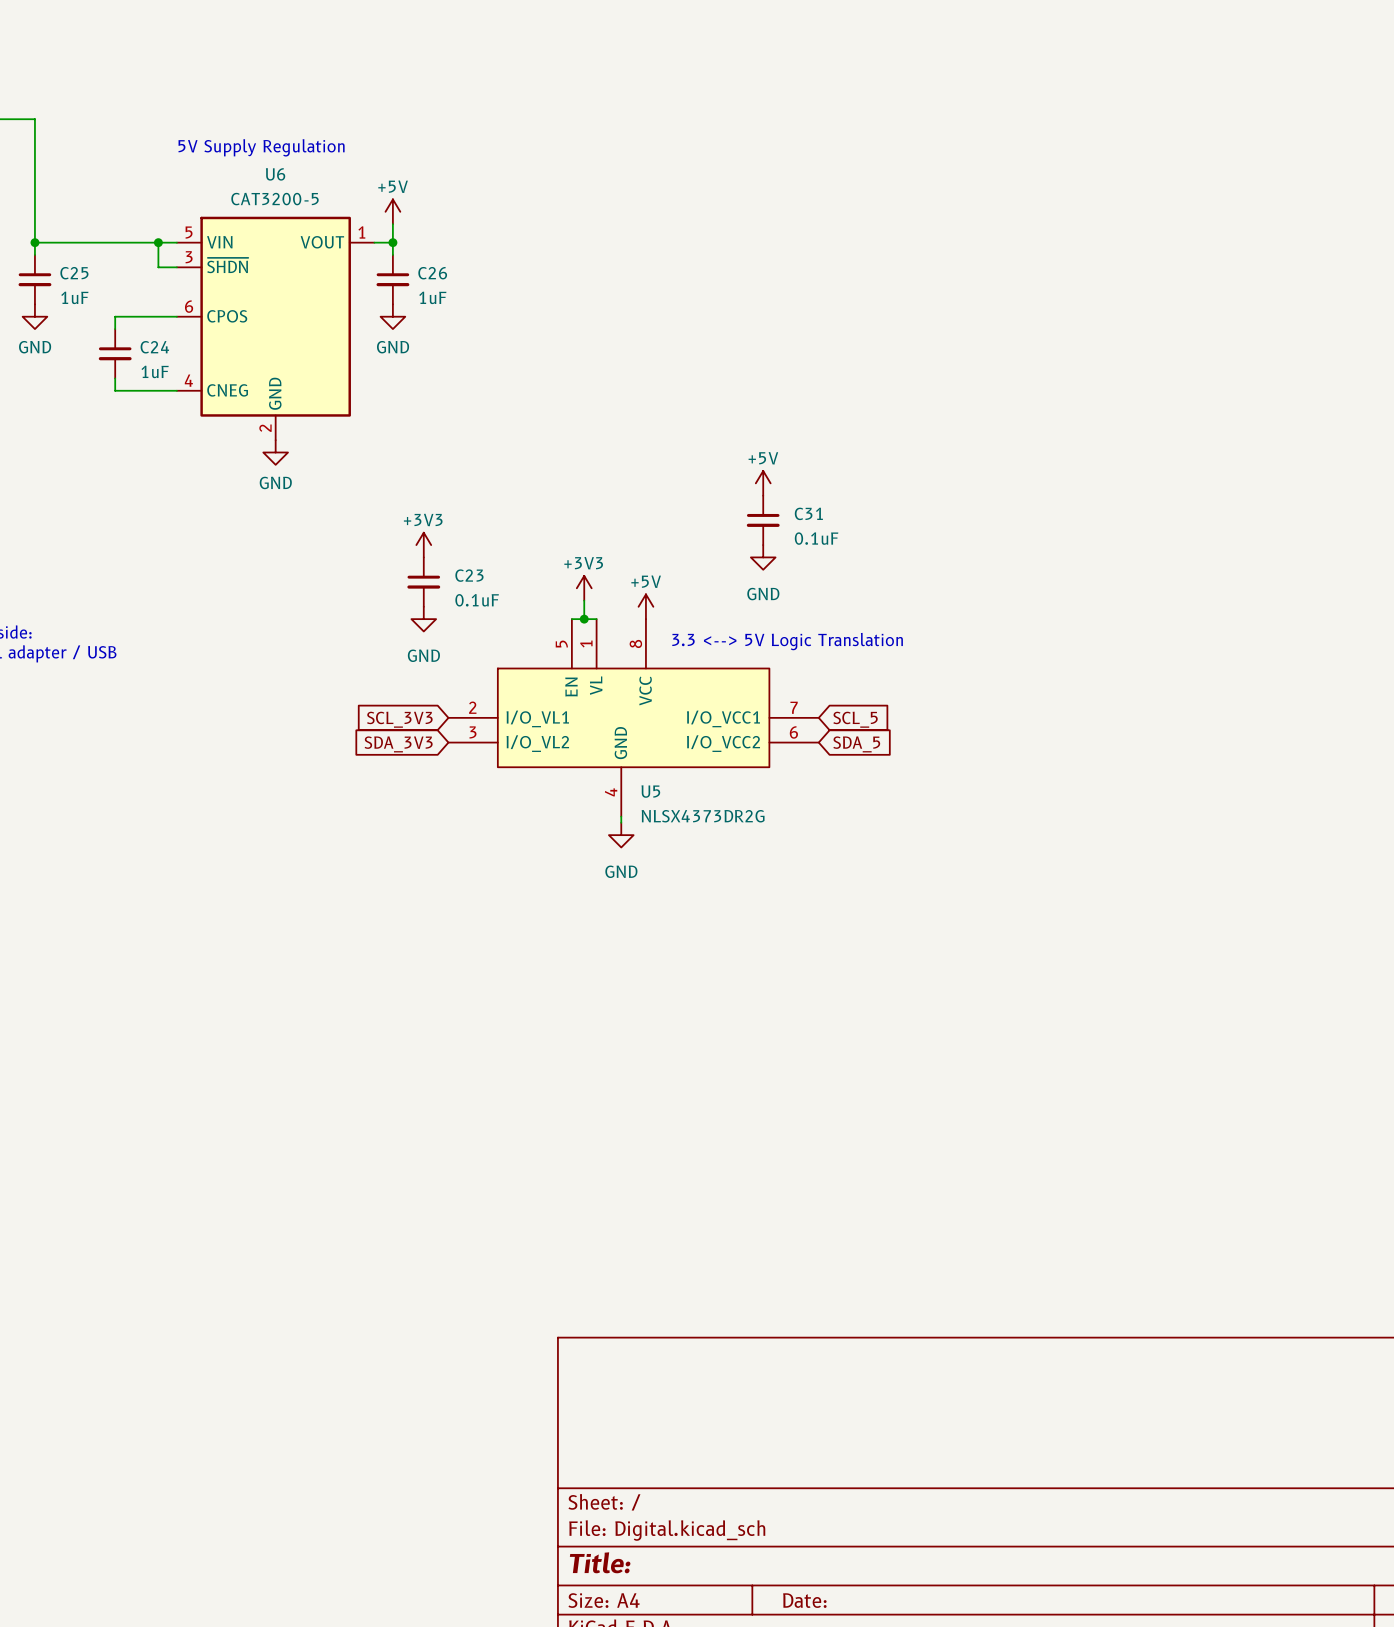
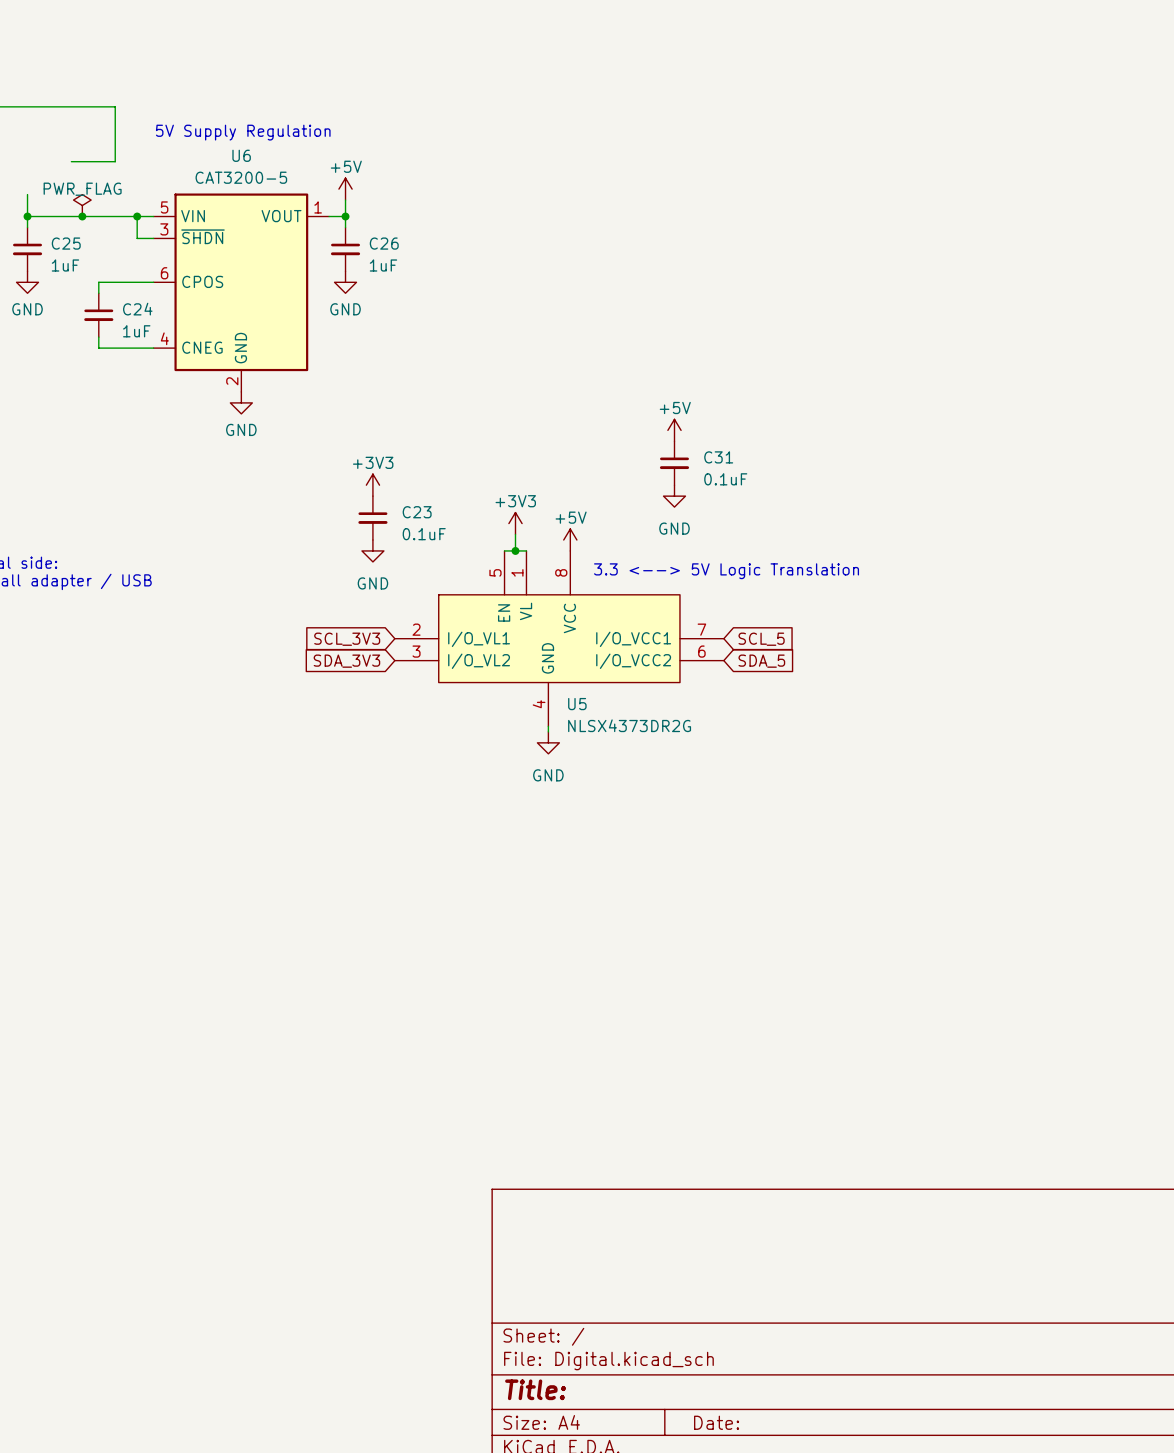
wire: (34, 119) (34, 217) -> (27, 106) (115, 106) (115, 161) (71, 161)
power symbol: none -> PWR_FLAG (82, 205)
junction: none -> (82, 216)

